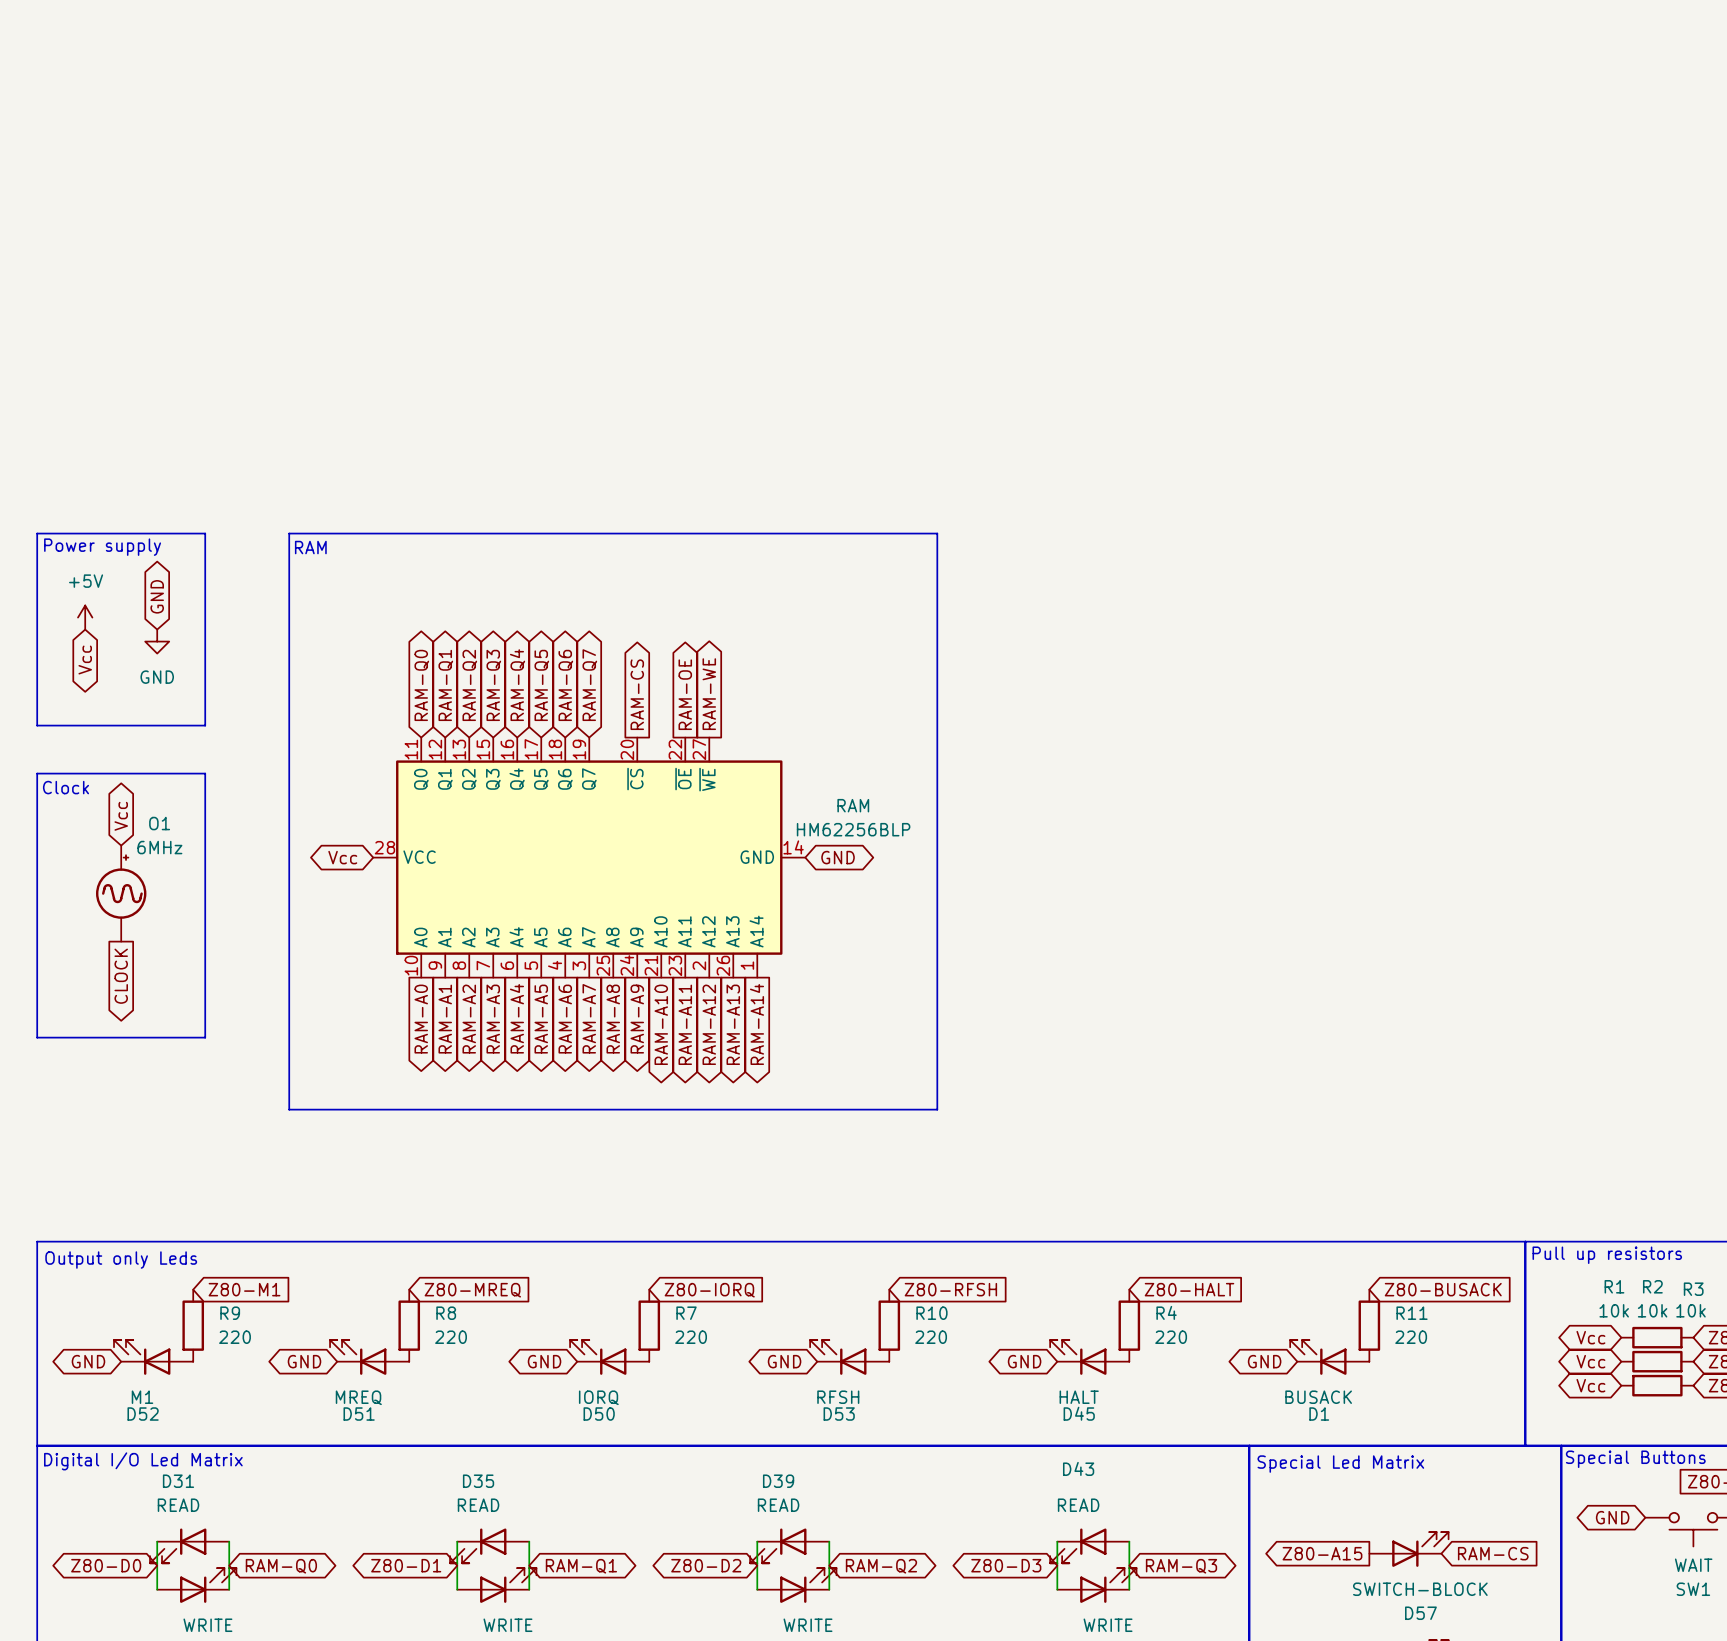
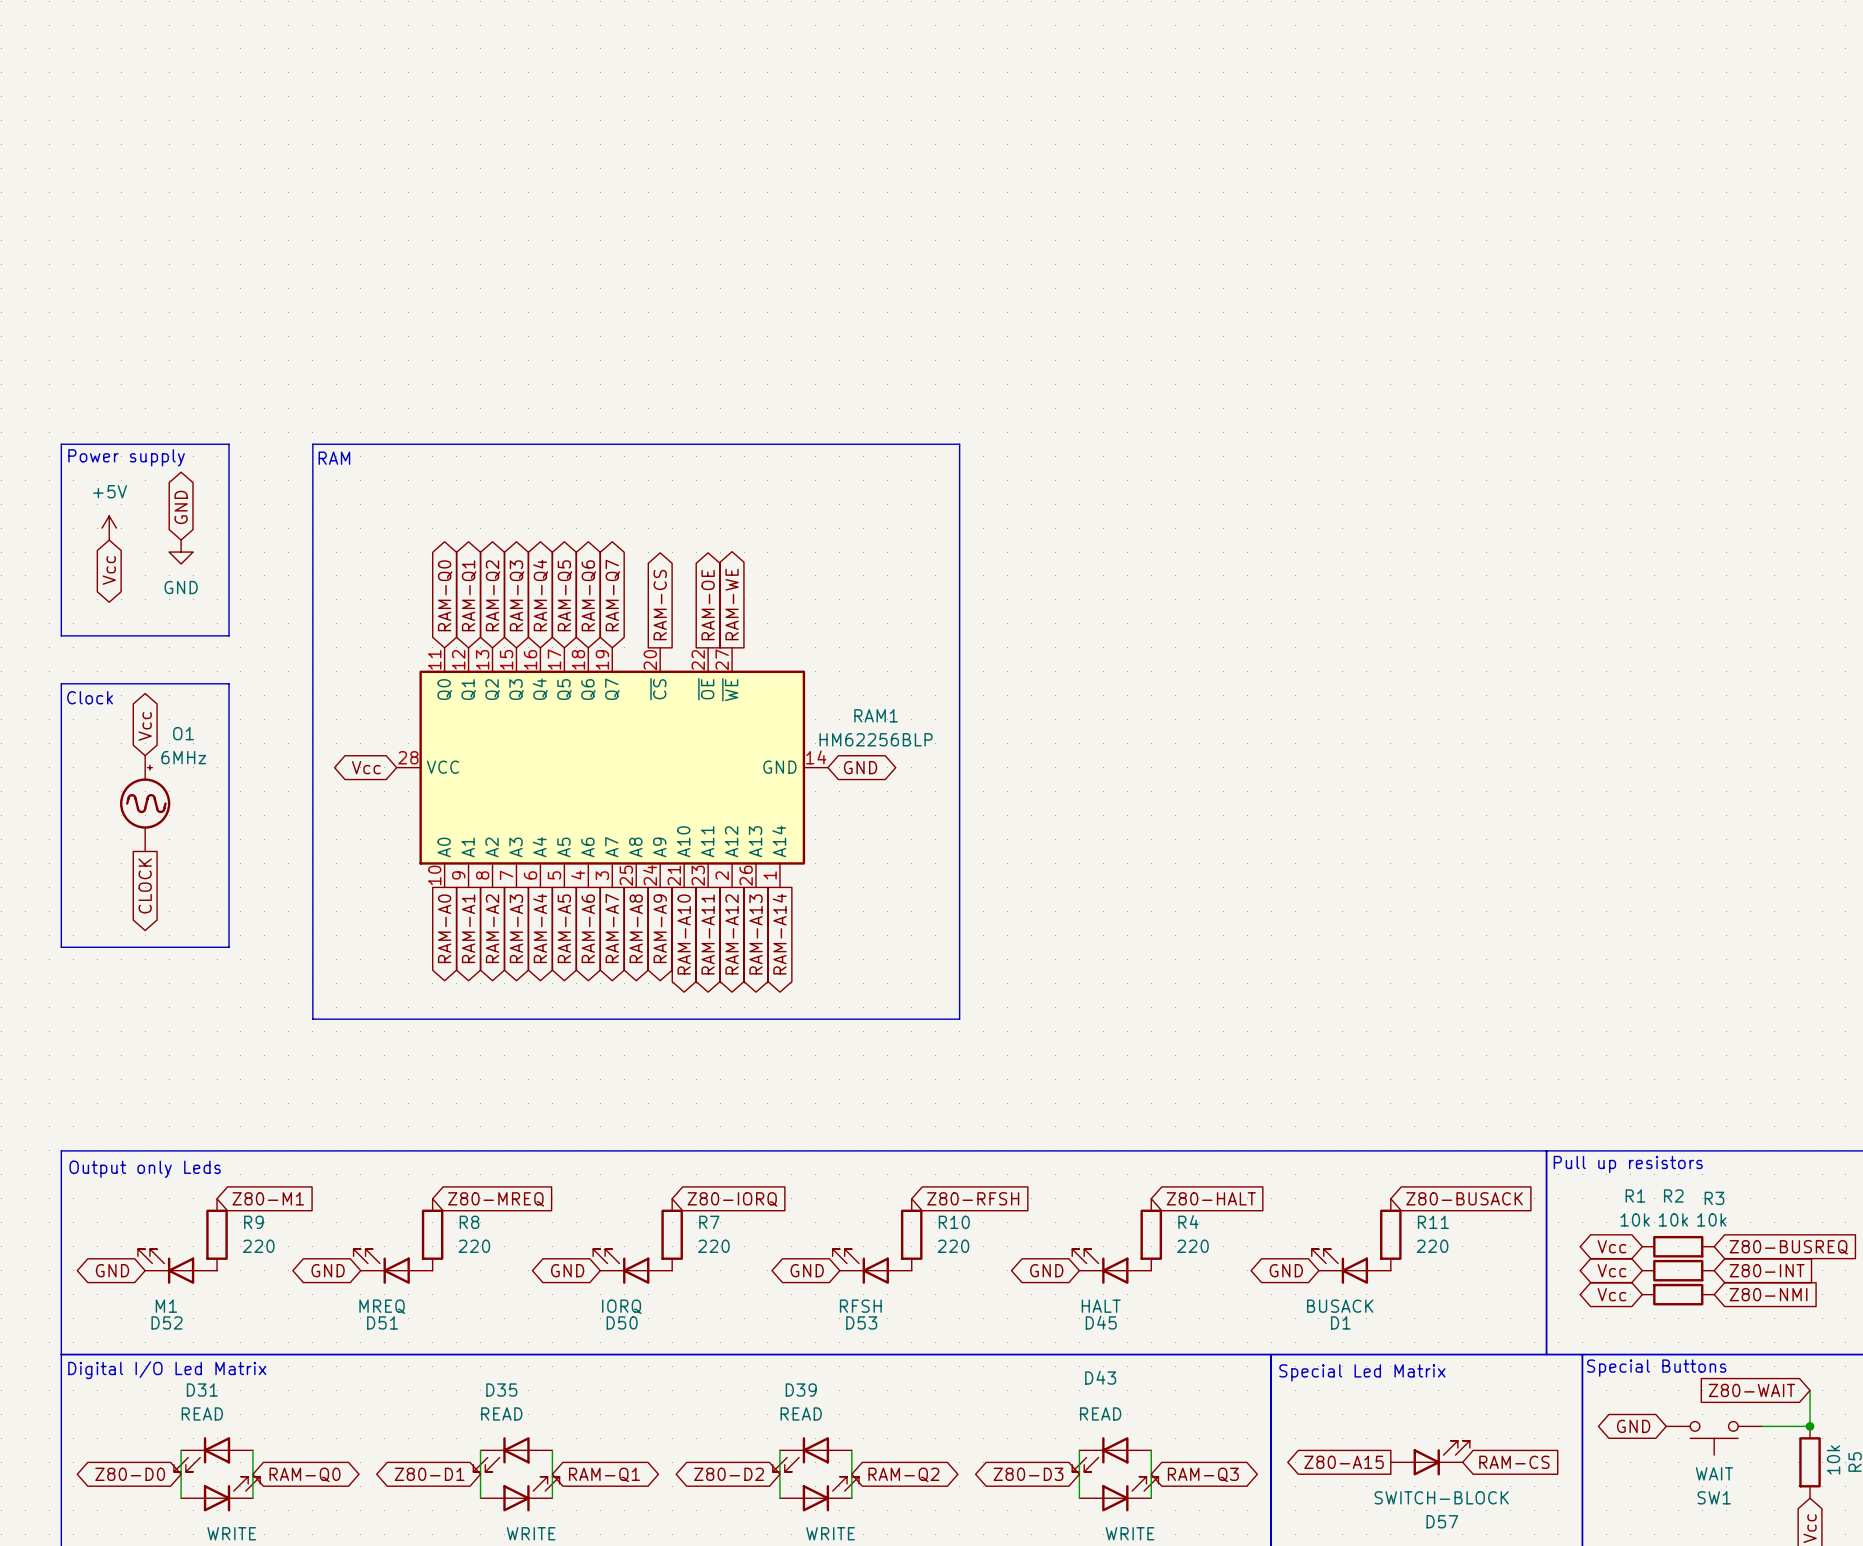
RAM name: RAM (853, 805) -> RAM1 (876, 715)

